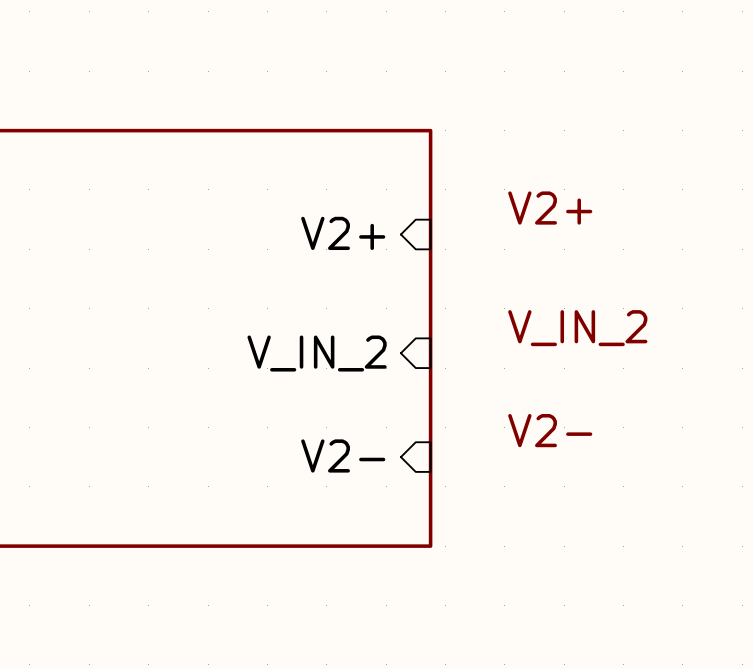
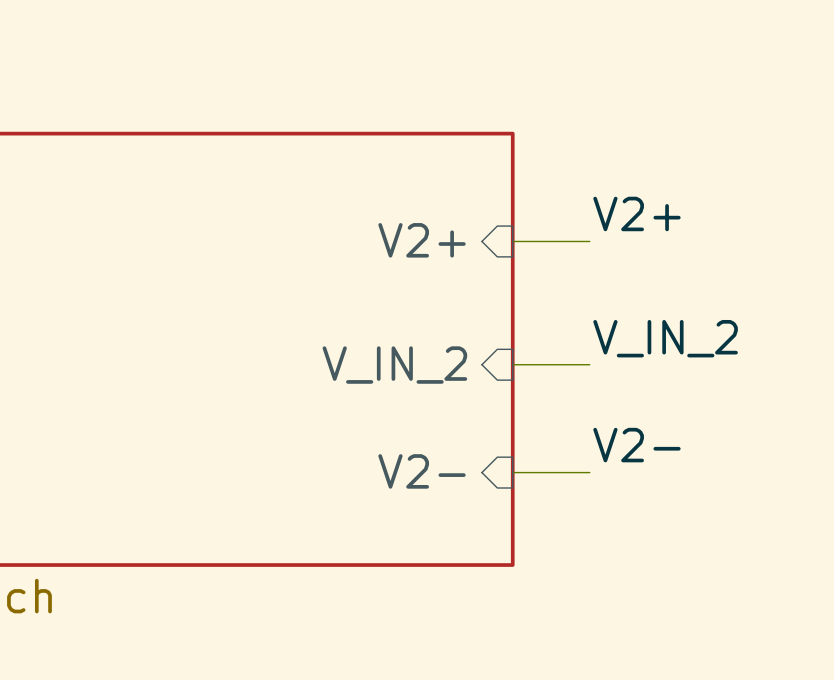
wire: none -> (512, 241) (589, 241)
wire: none -> (512, 364) (589, 364)
wire: none -> (512, 472) (589, 472)

